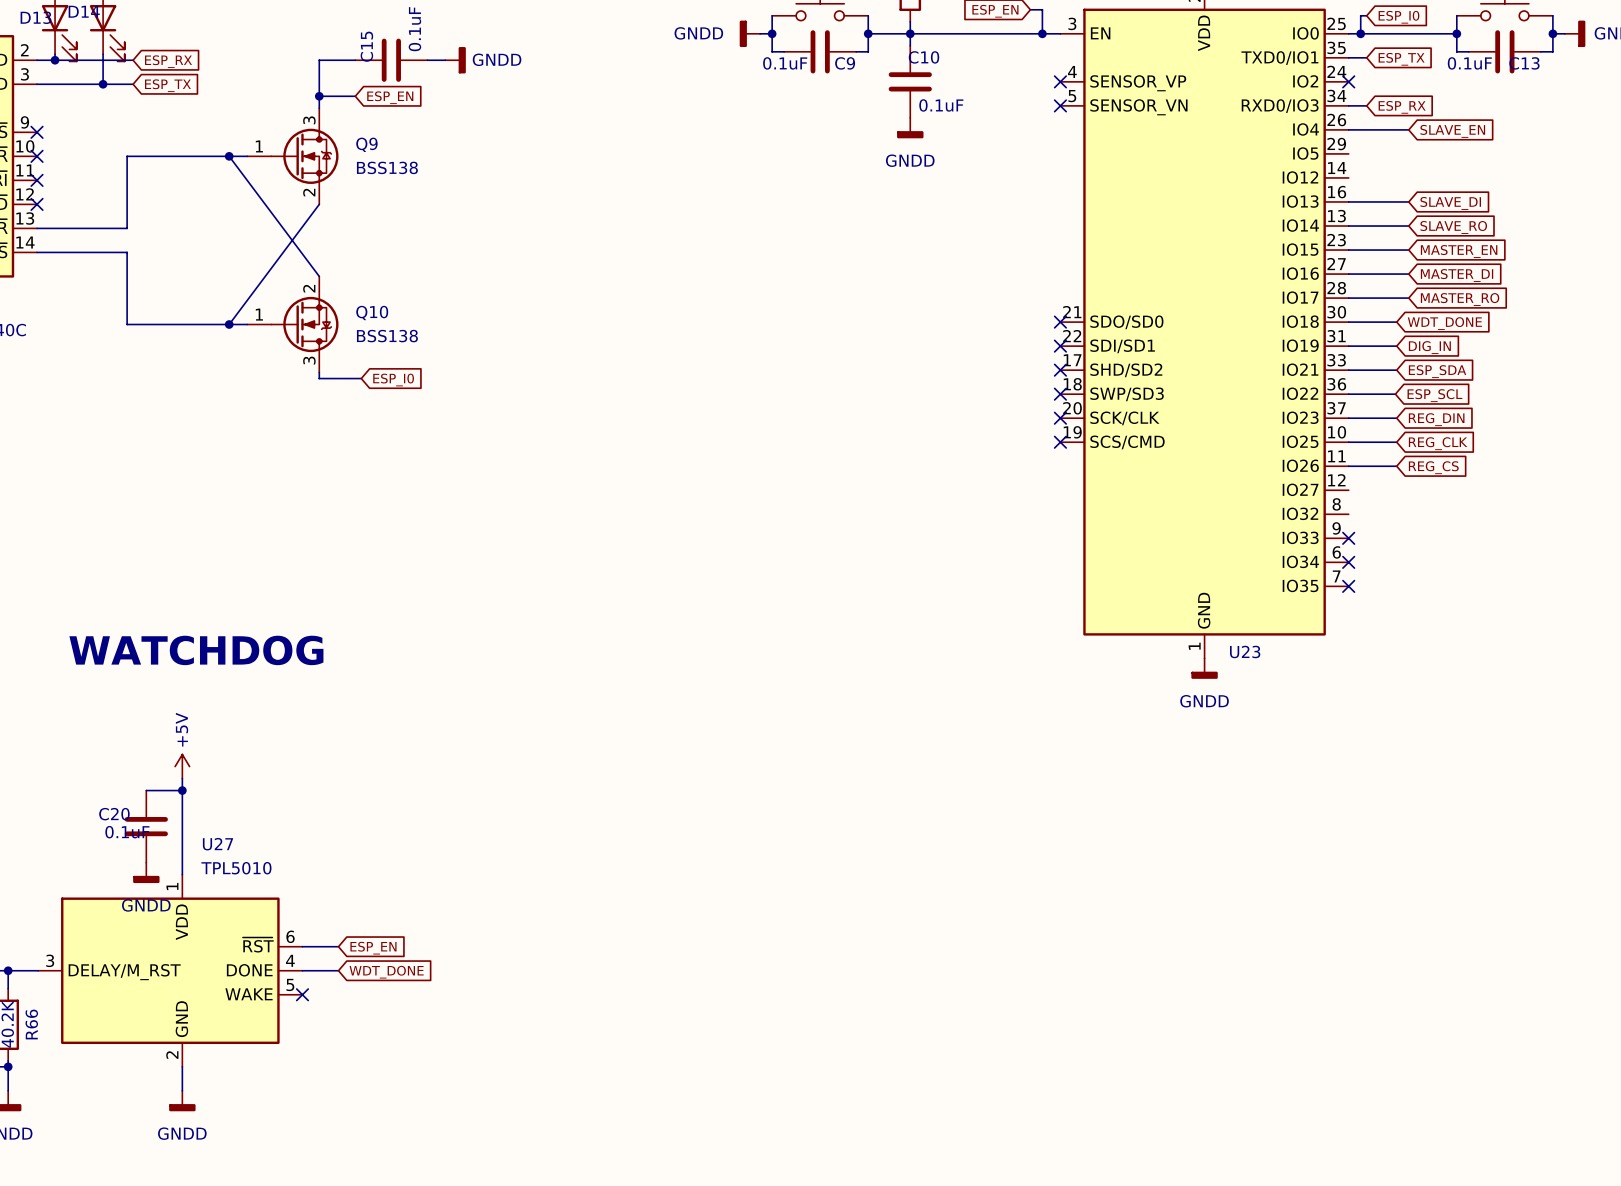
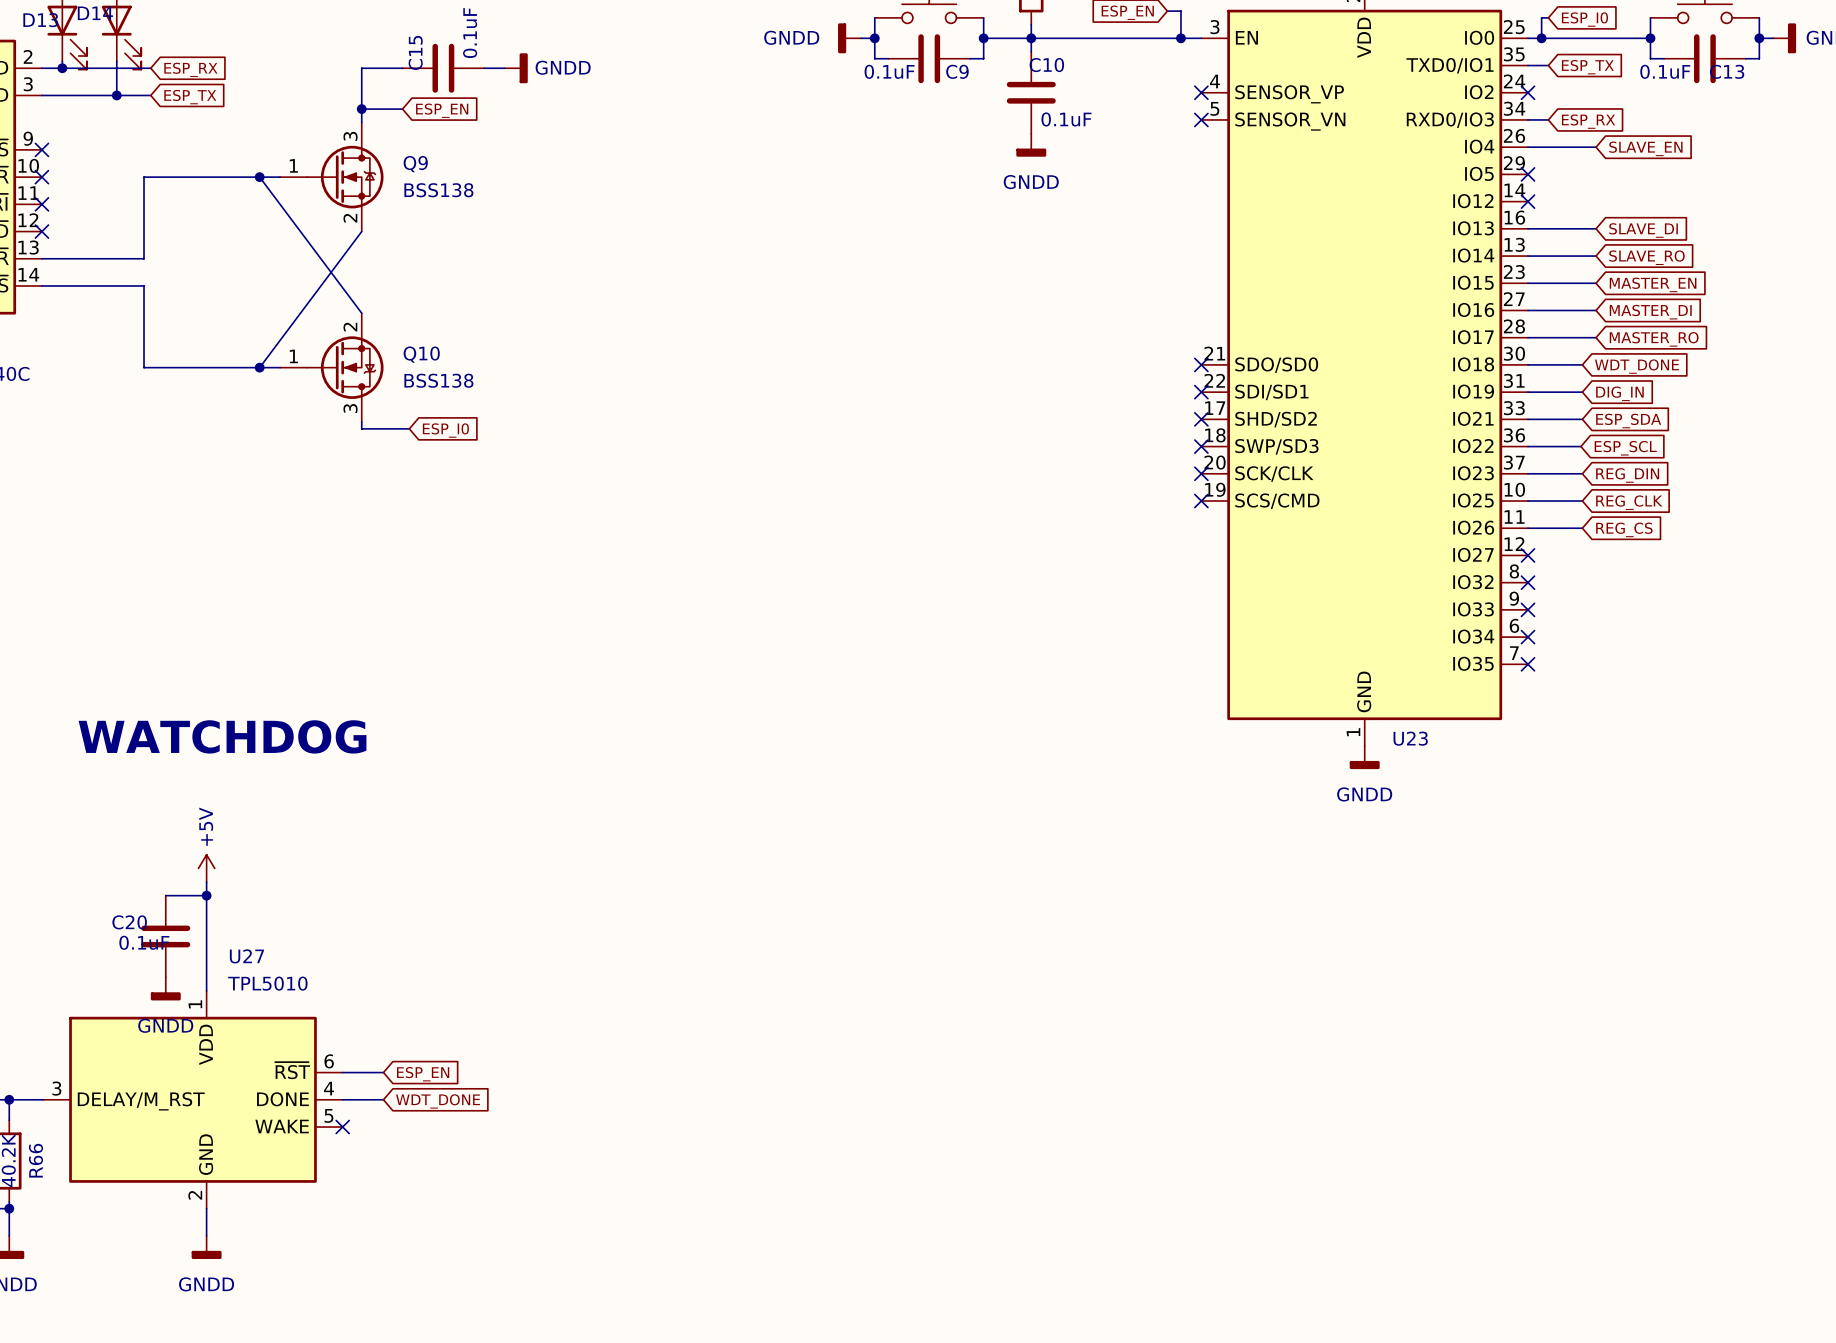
no-connect mark: none -> (1528, 174)
no-connect mark: none -> (1528, 201)
no-connect mark: none -> (1528, 555)
no-connect mark: none -> (1528, 582)

